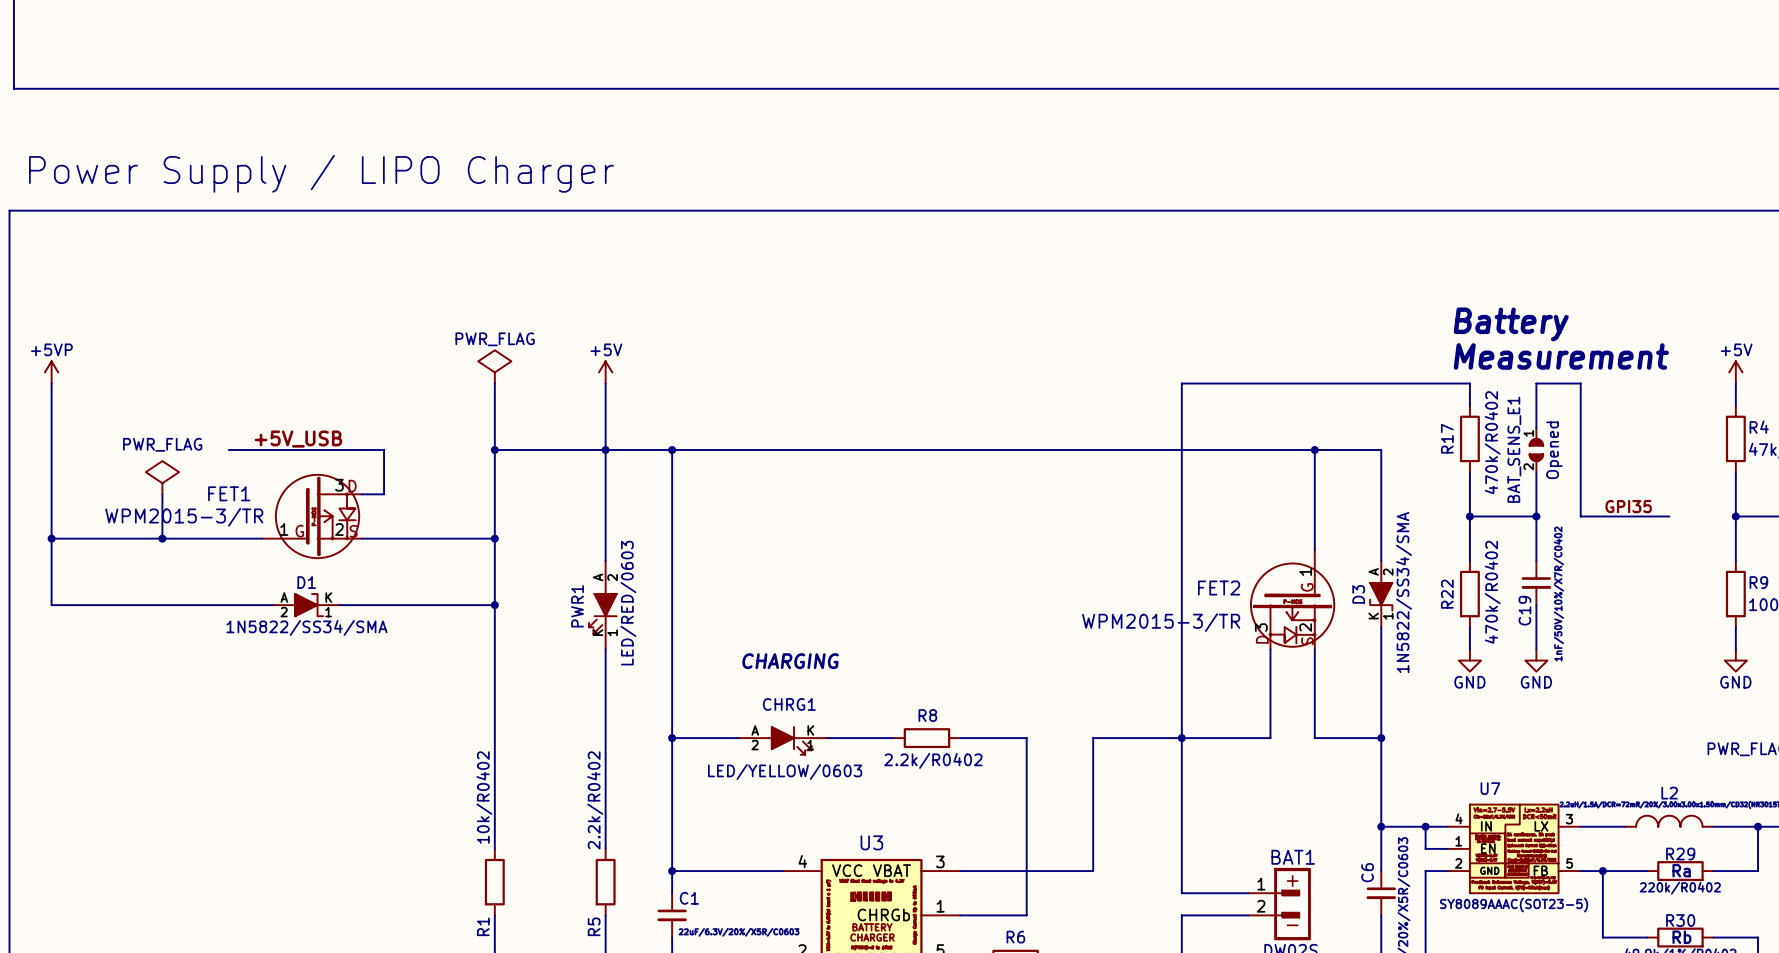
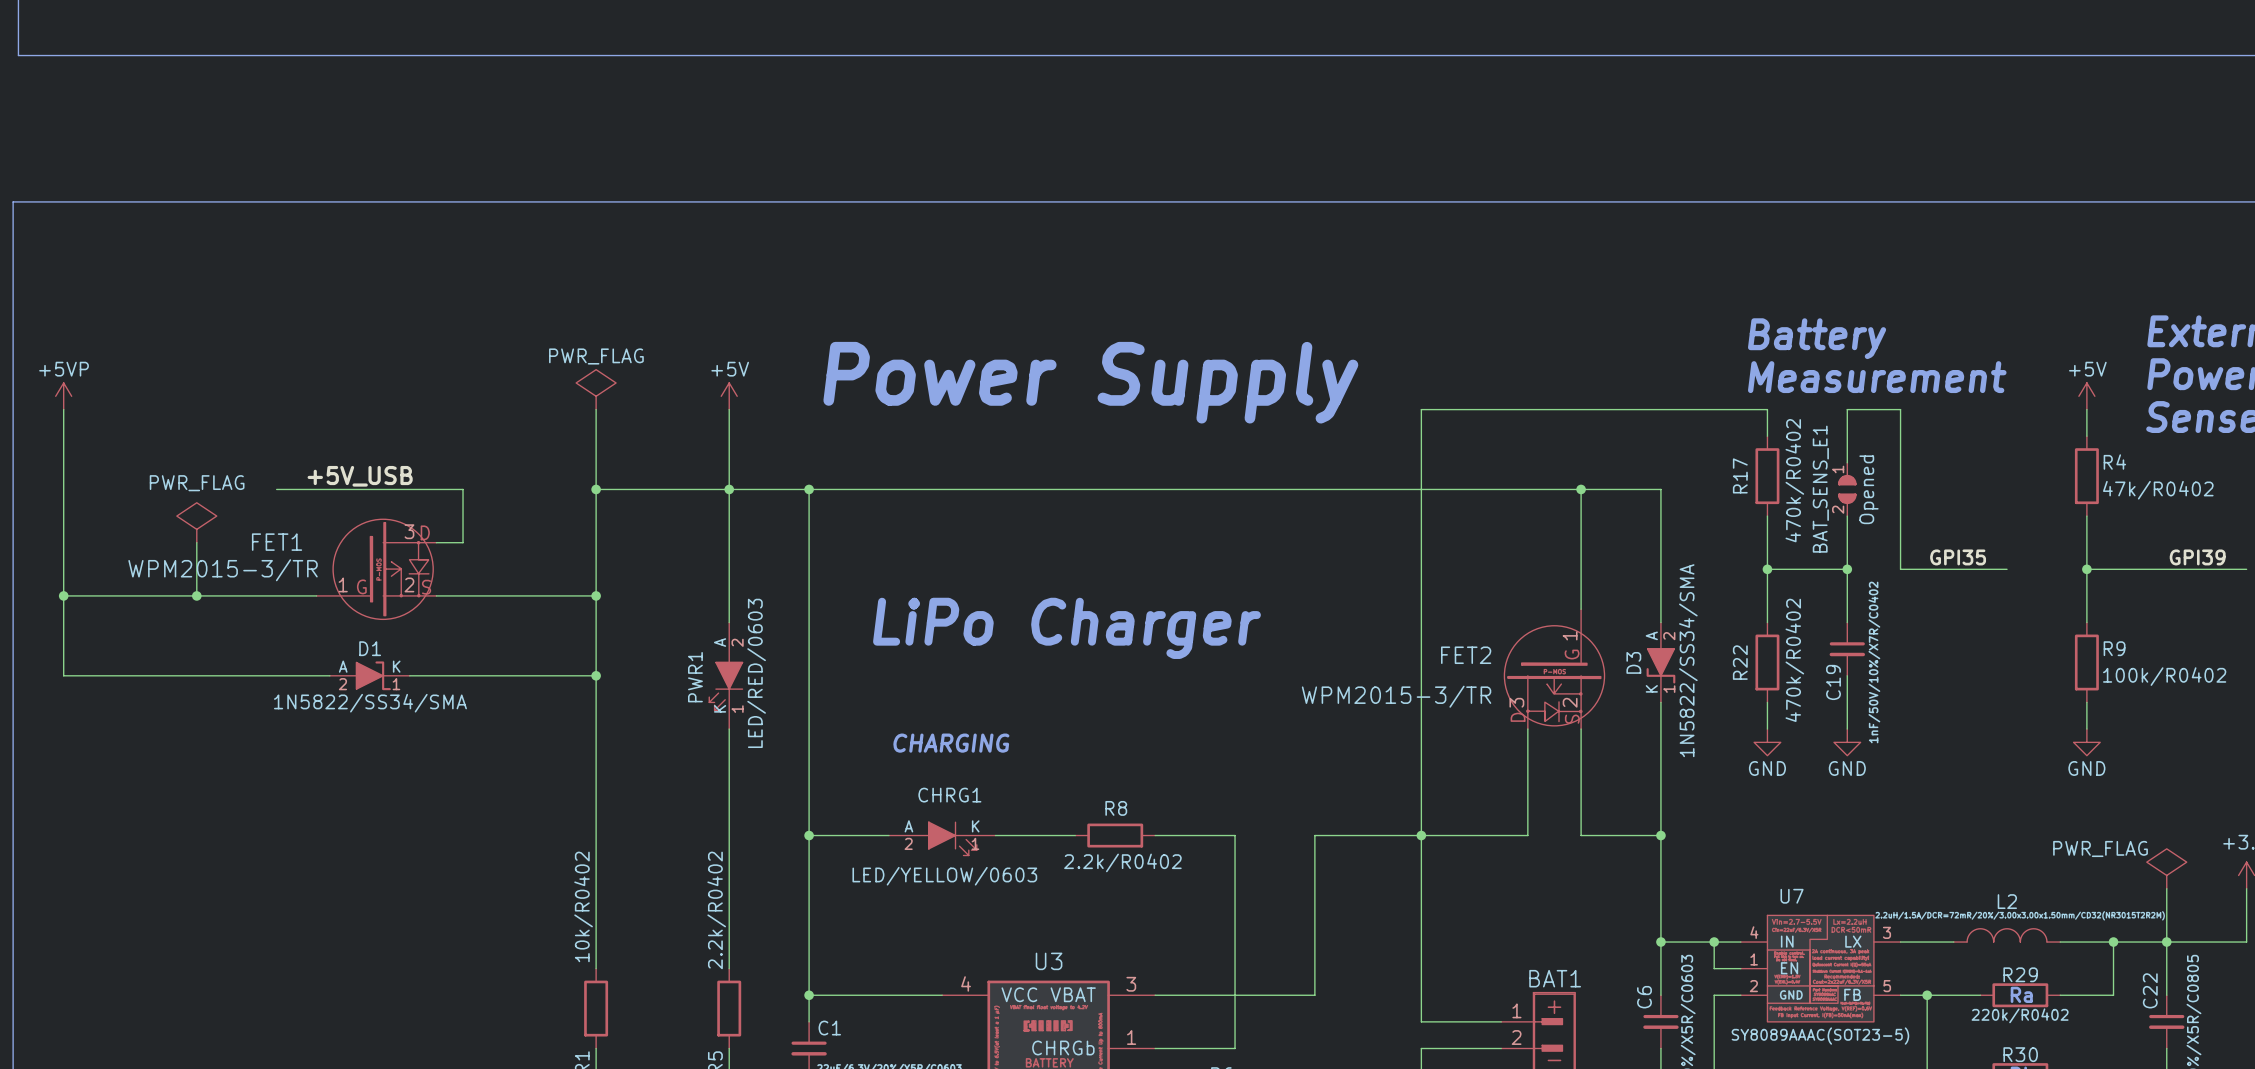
text: Power Supply / LIPO Charger (321, 173) -> none
text: none -> Power Supply (1090, 382)
text: none -> LiPo Charger (1067, 628)

